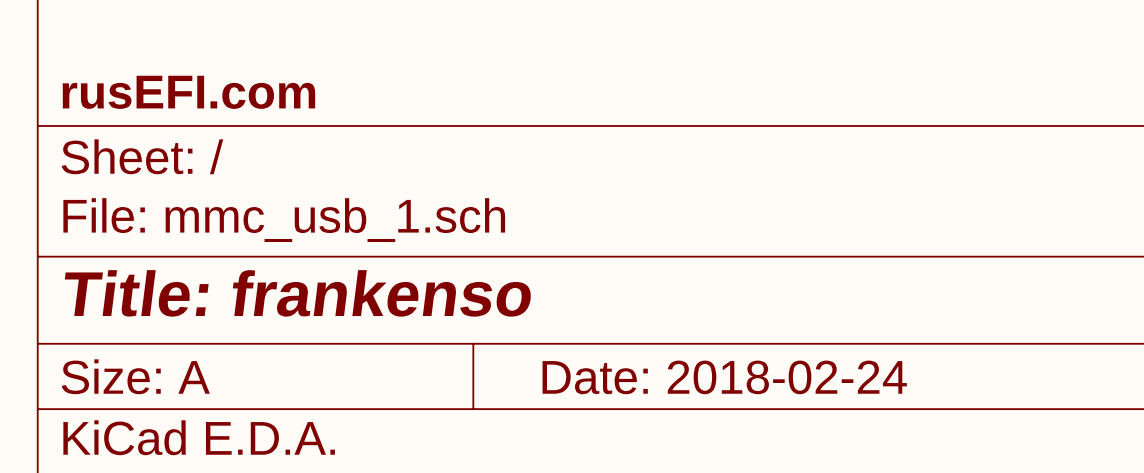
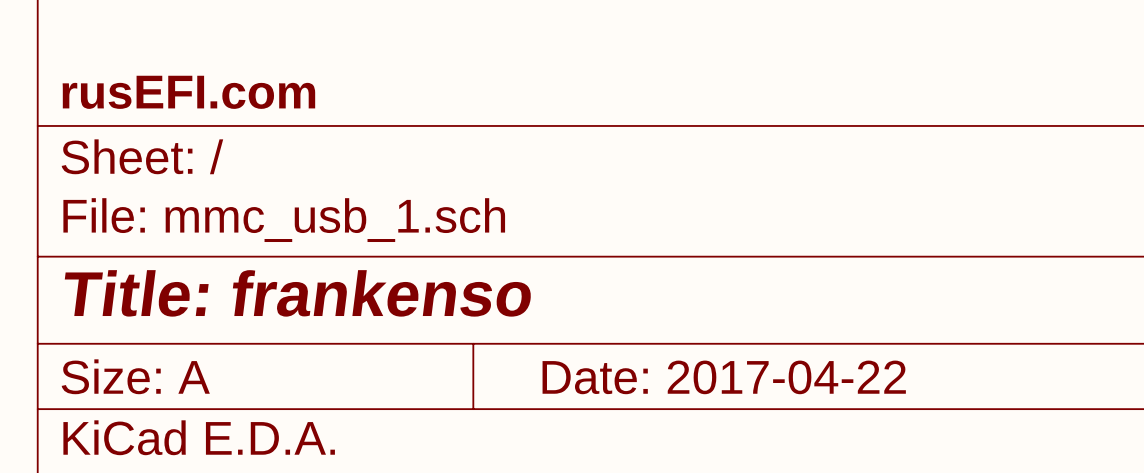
title block: Date: 2018-02-24 (724, 377) -> Date: 2017-04-22 (724, 377)

